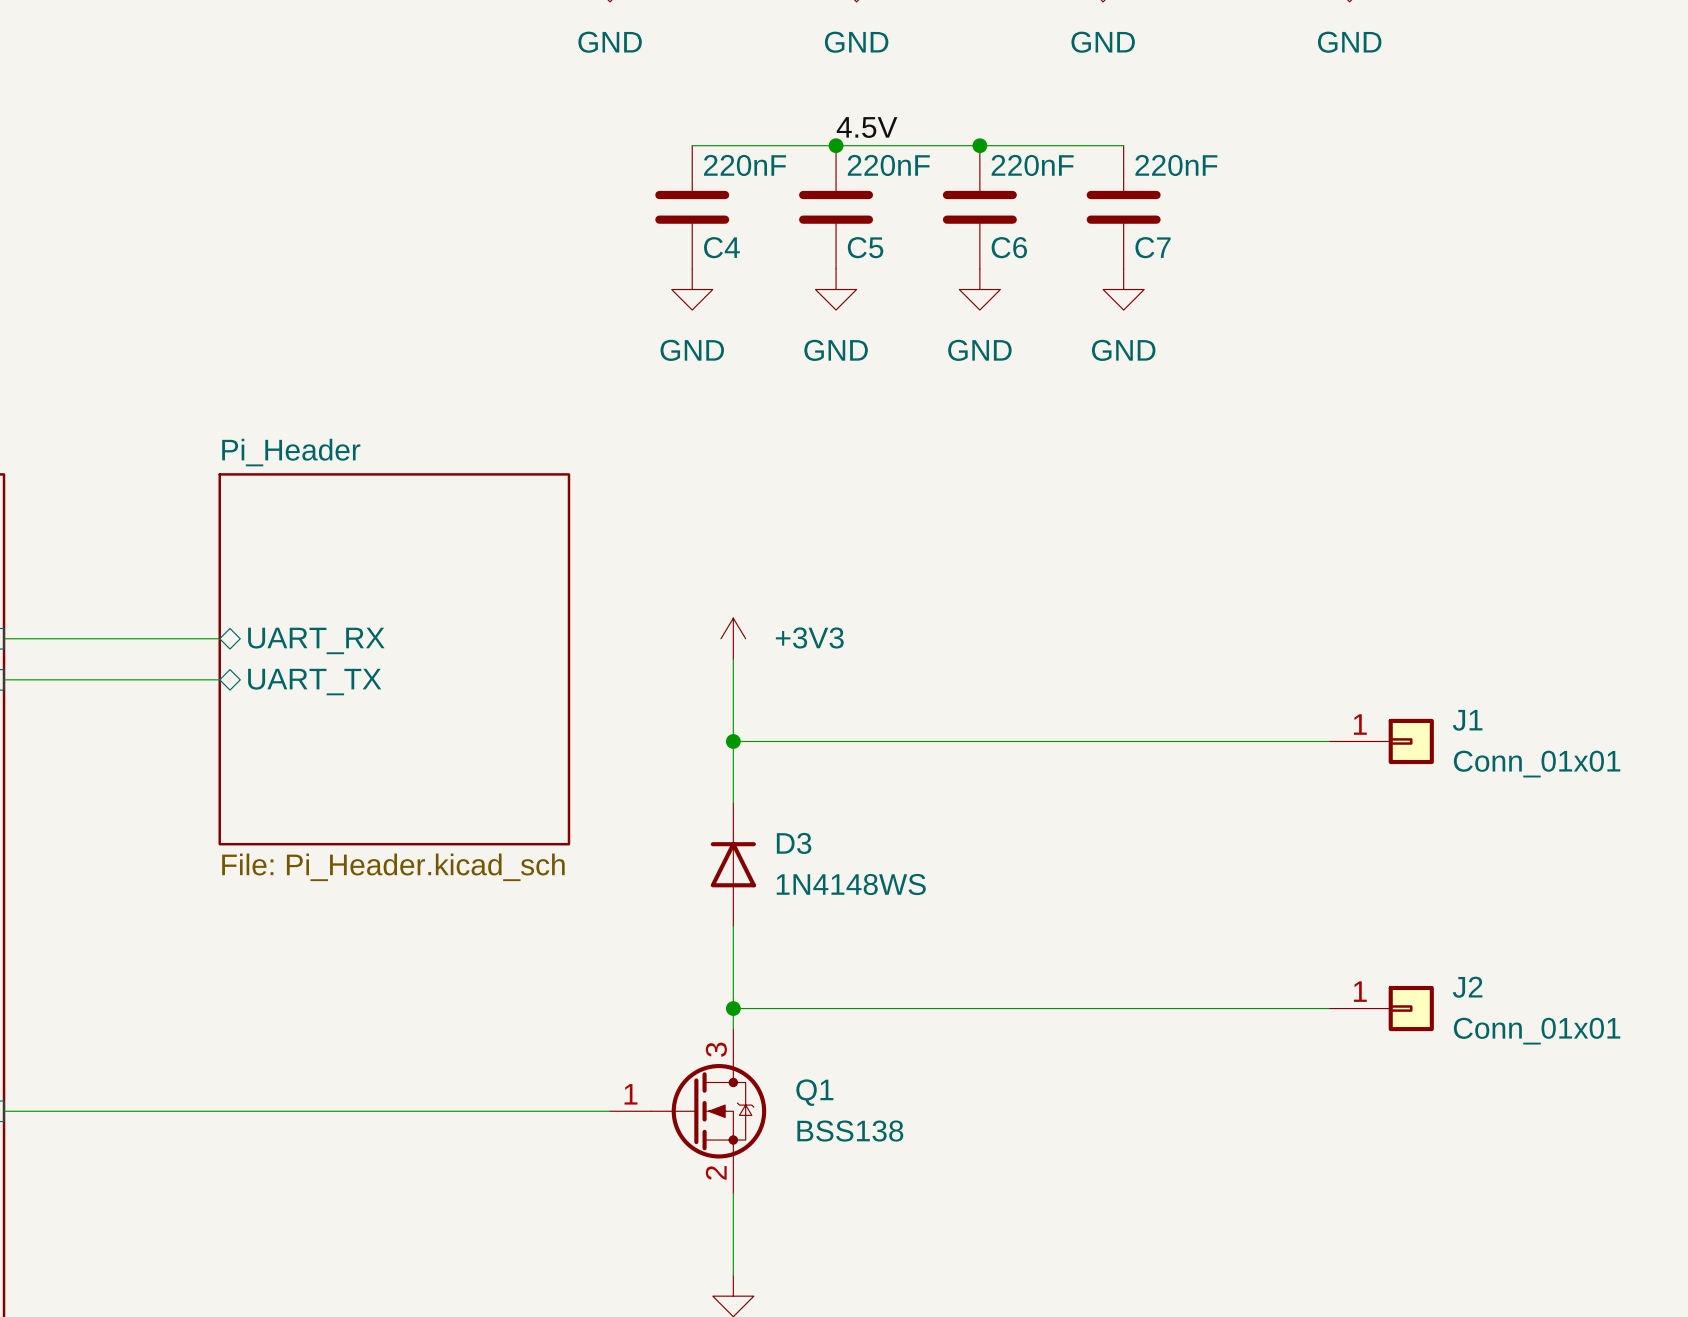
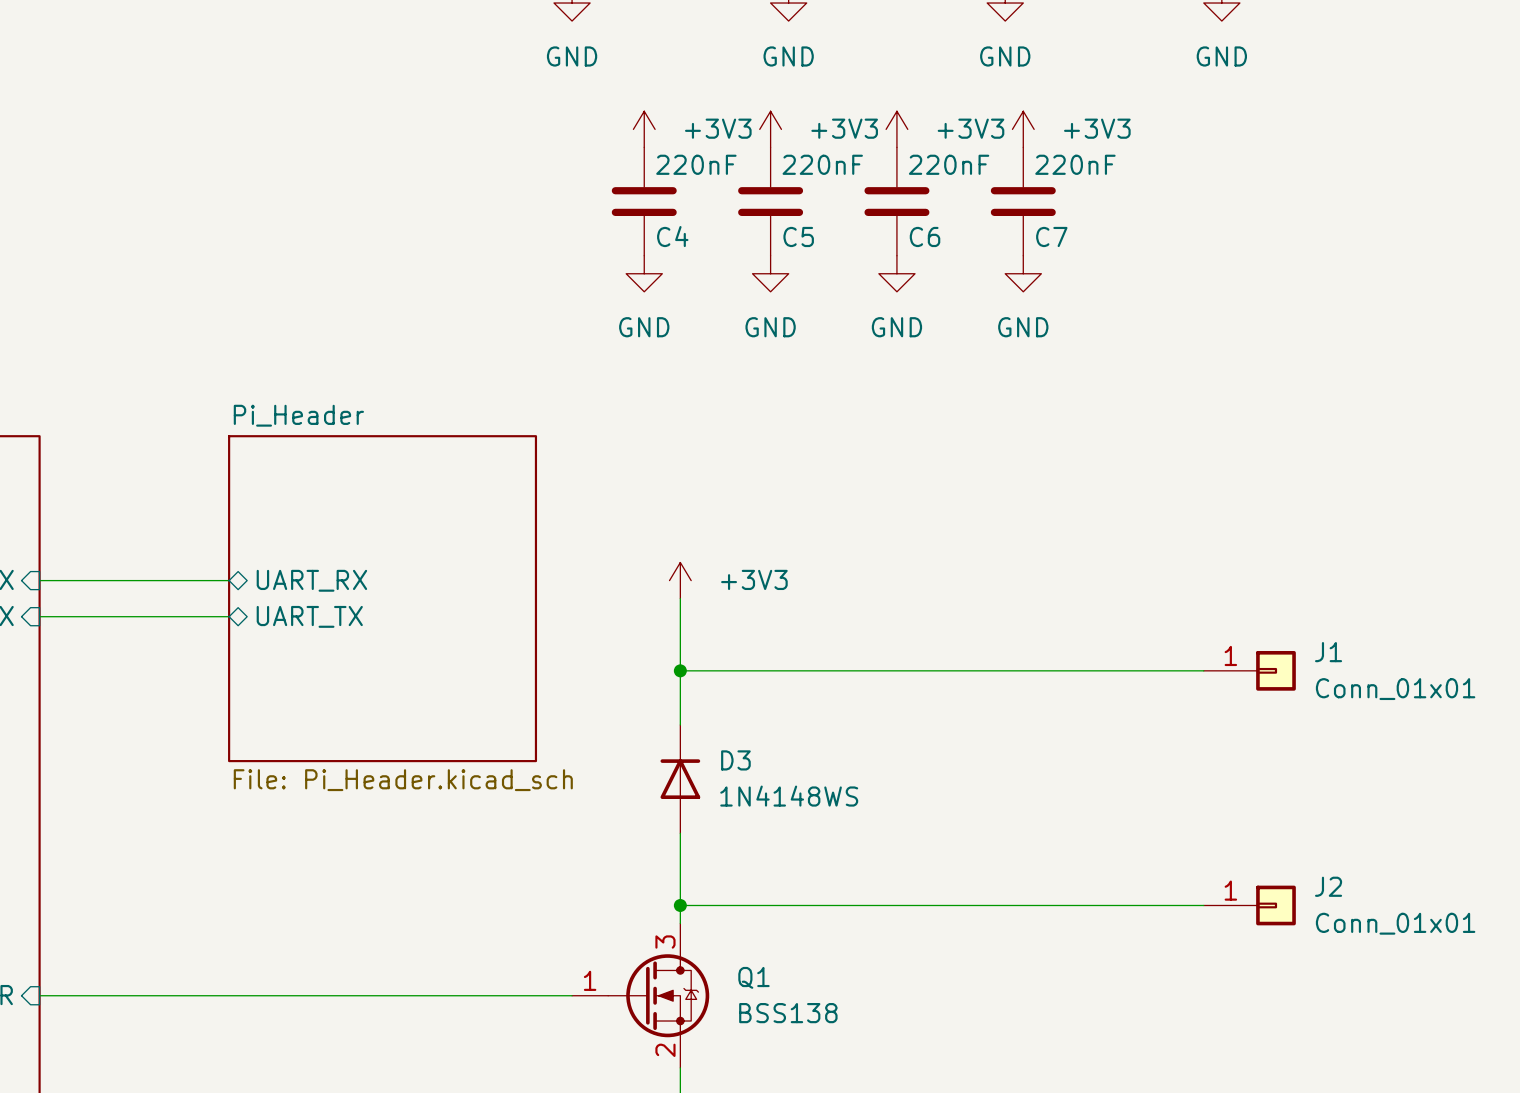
power symbol: none -> +3V3 (644, 129)
power symbol: none -> +3V3 (770, 129)
power symbol: none -> +3V3 (896, 129)
power symbol: none -> +3V3 (1023, 129)
label: 4.5V (867, 127) -> none
wire: (692, 145) (1123, 145) -> none
junction: (836, 145) -> none
junction: (979, 145) -> none

